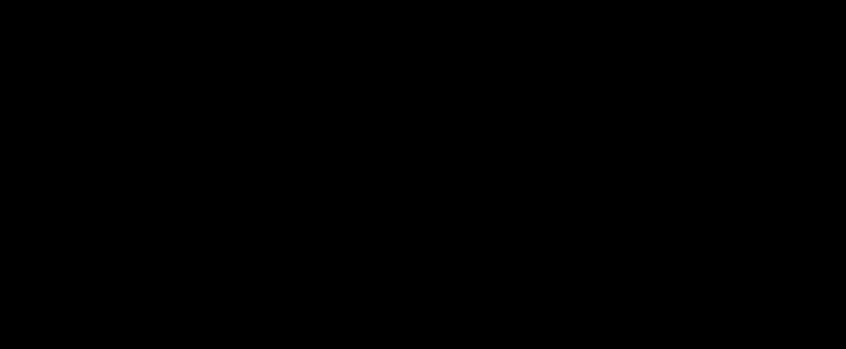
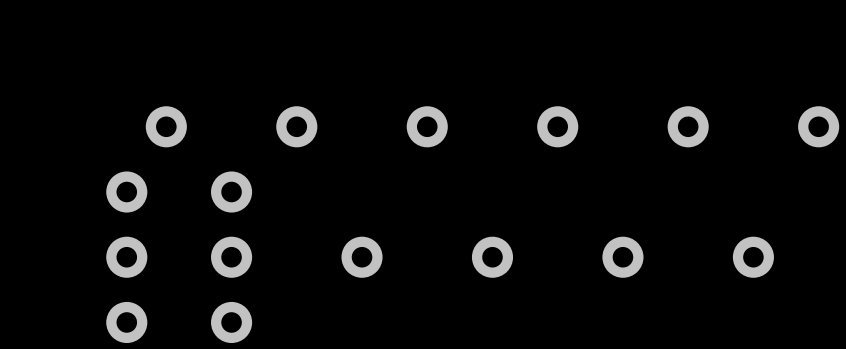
via: none -> (166, 126)
via: none -> (296, 126)
via: none -> (427, 126)
via: none -> (557, 126)
via: none -> (688, 126)
via: none -> (818, 126)
via: none -> (126, 192)
via: none -> (231, 192)
via: none -> (126, 257)
via: none -> (231, 257)
via: none -> (362, 257)
via: none -> (492, 257)
via: none -> (622, 257)
via: none -> (753, 257)
via: none -> (126, 322)
via: none -> (231, 322)

